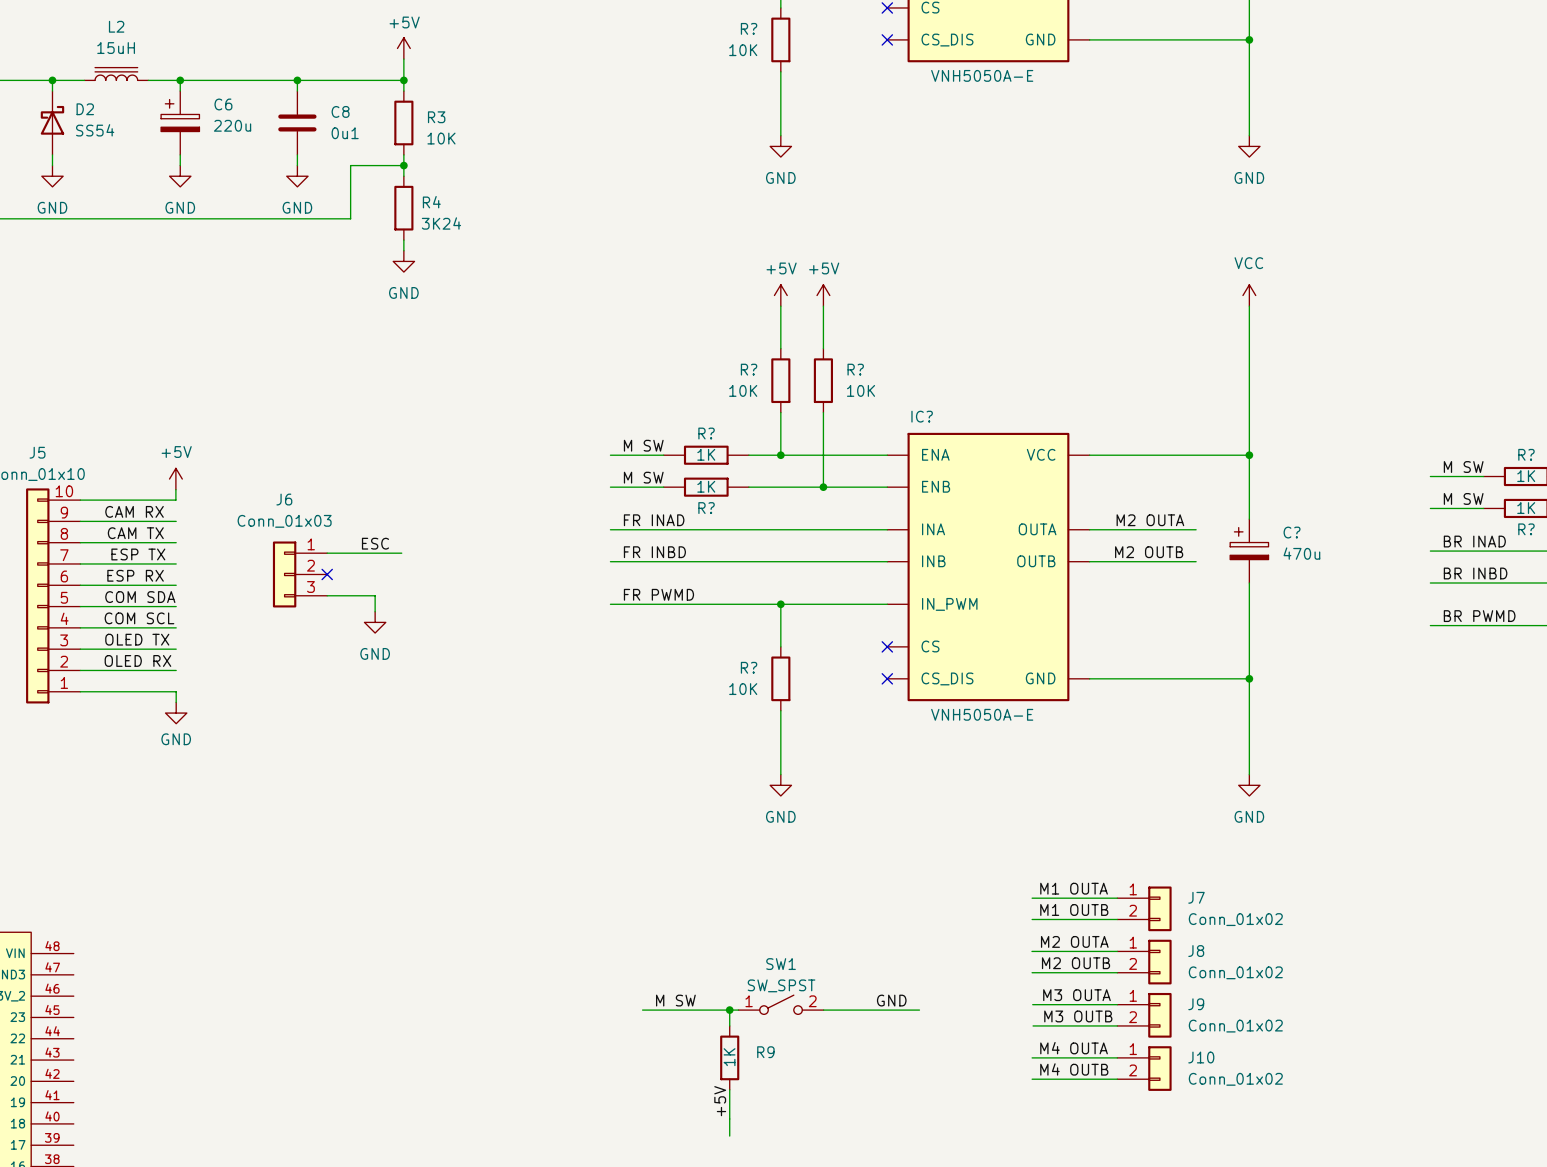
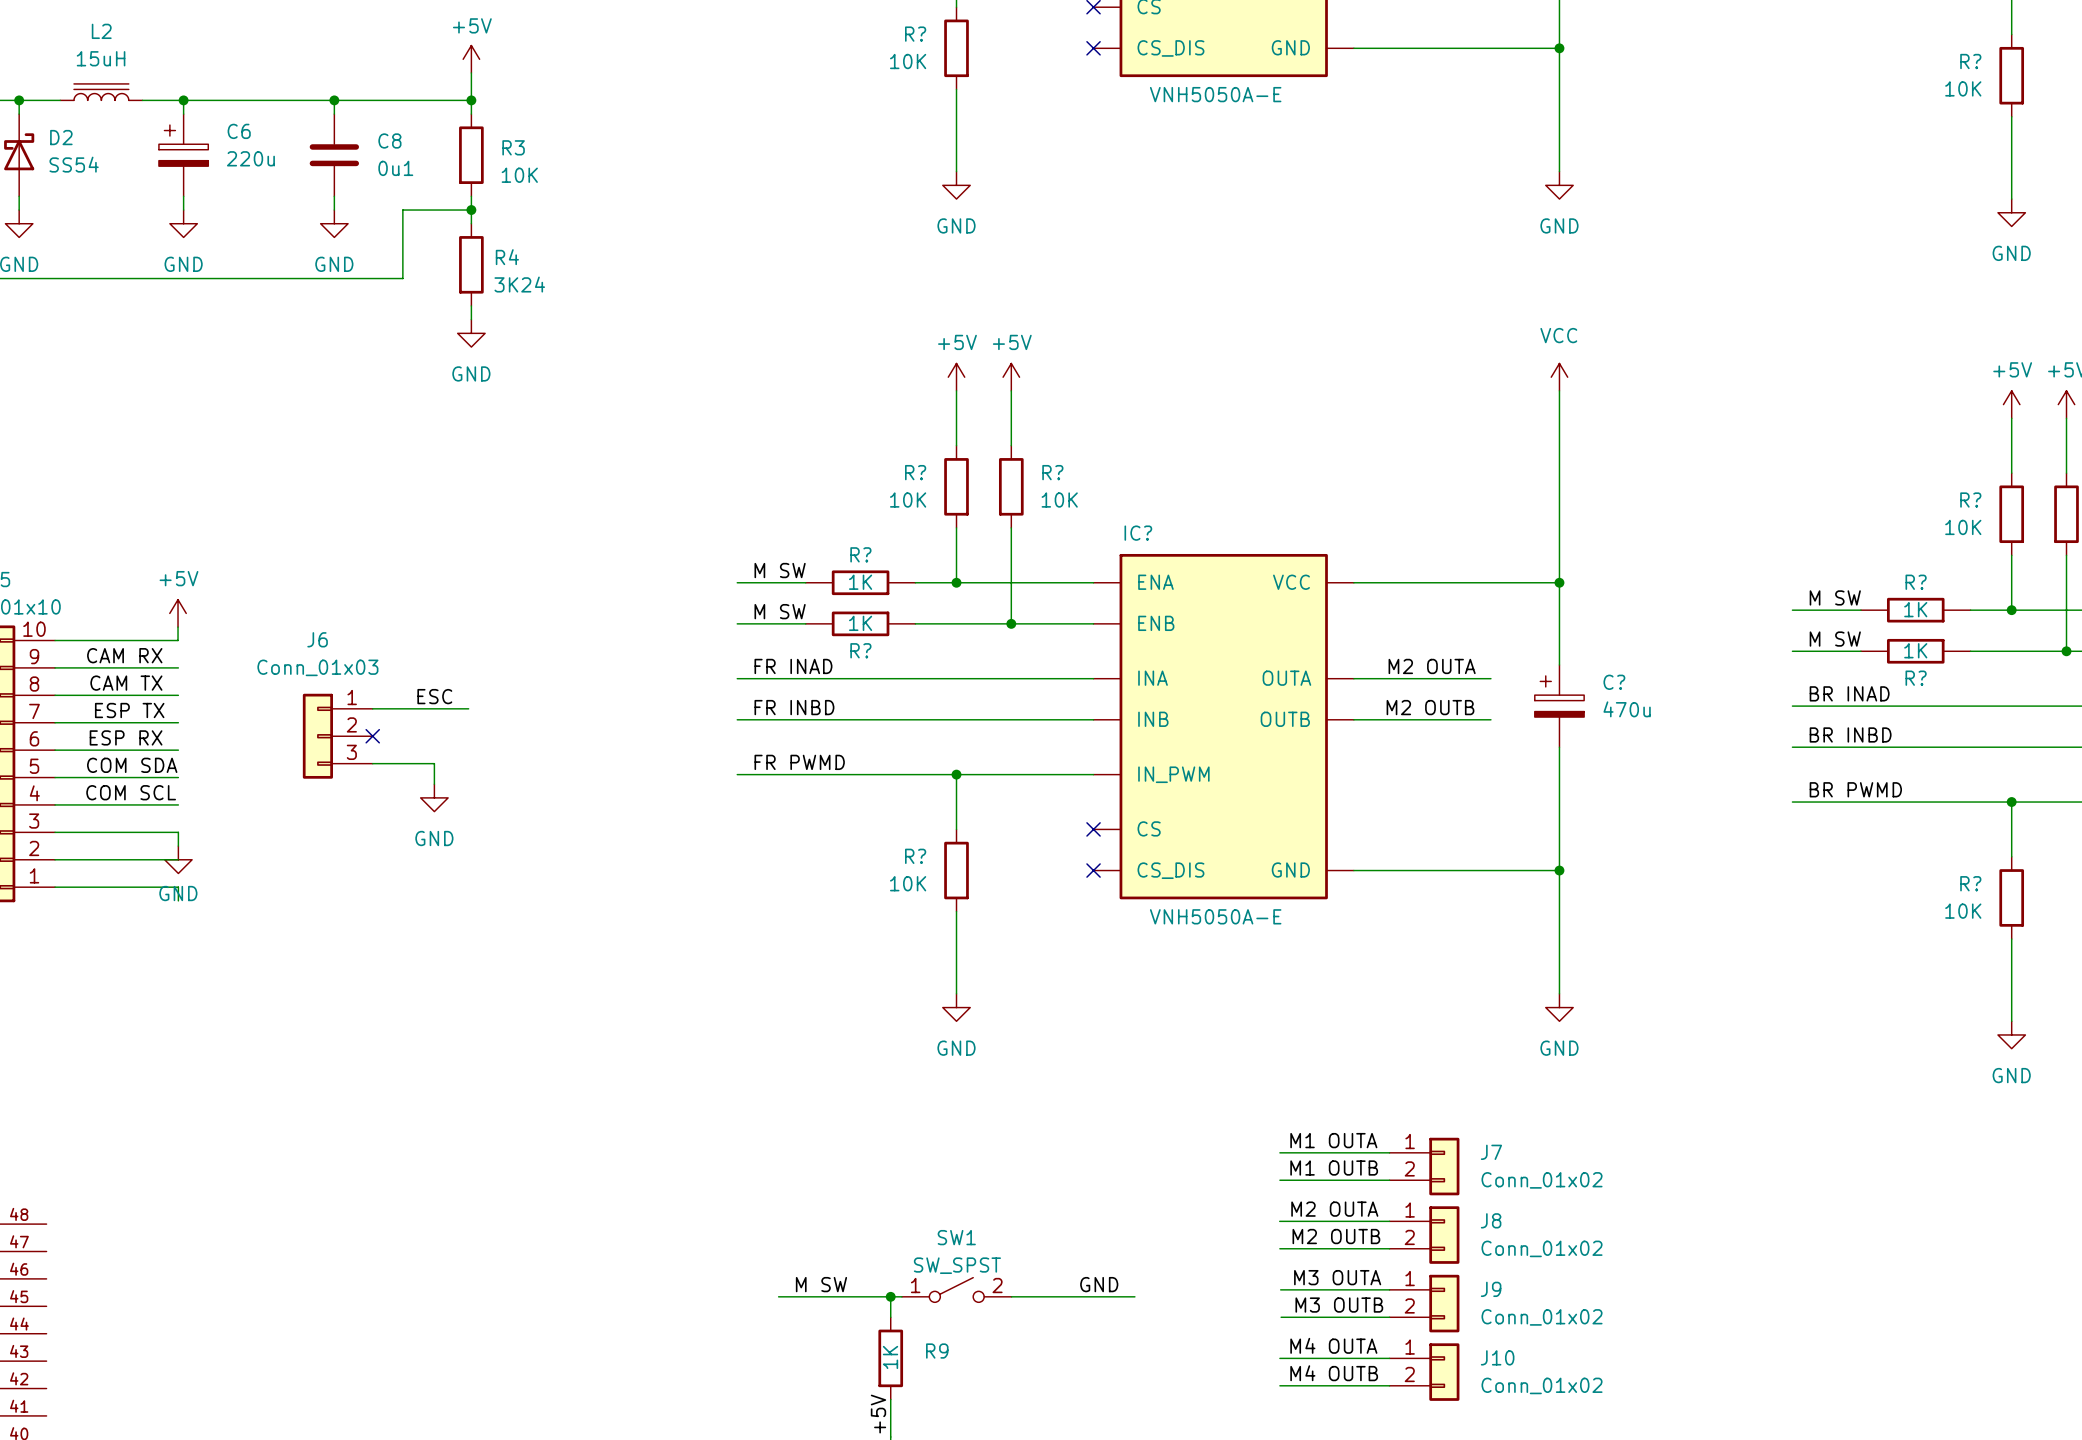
label: OLED TX (137, 639) -> none
wire: none -> (178, 832) (178, 846)
label: OLED RX (137, 660) -> none
power symbol position: GND (176, 713) -> GND (178, 859)

